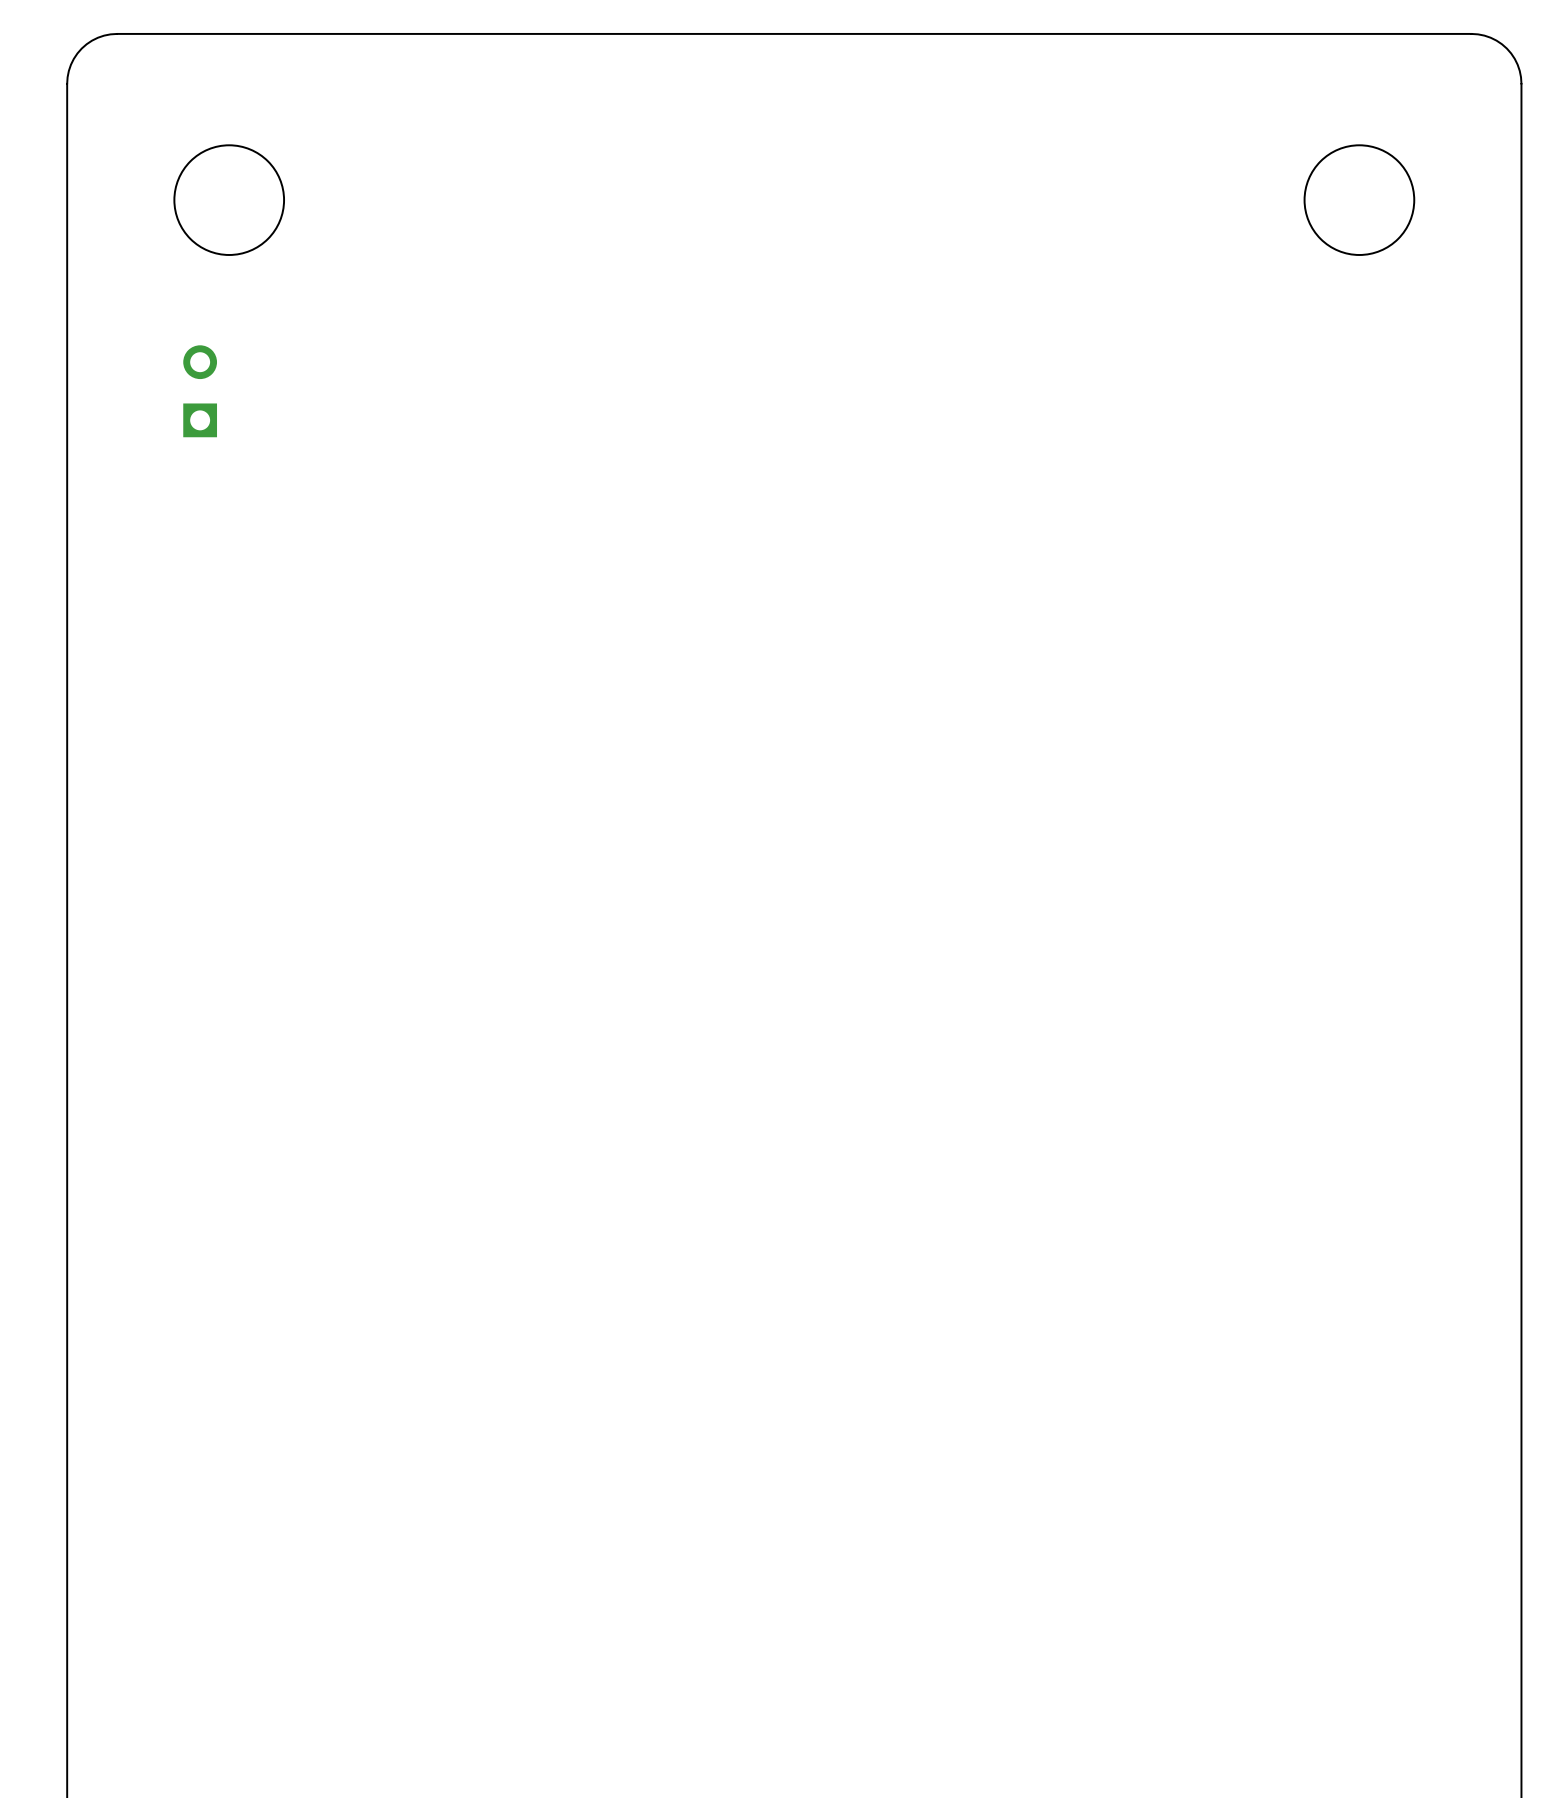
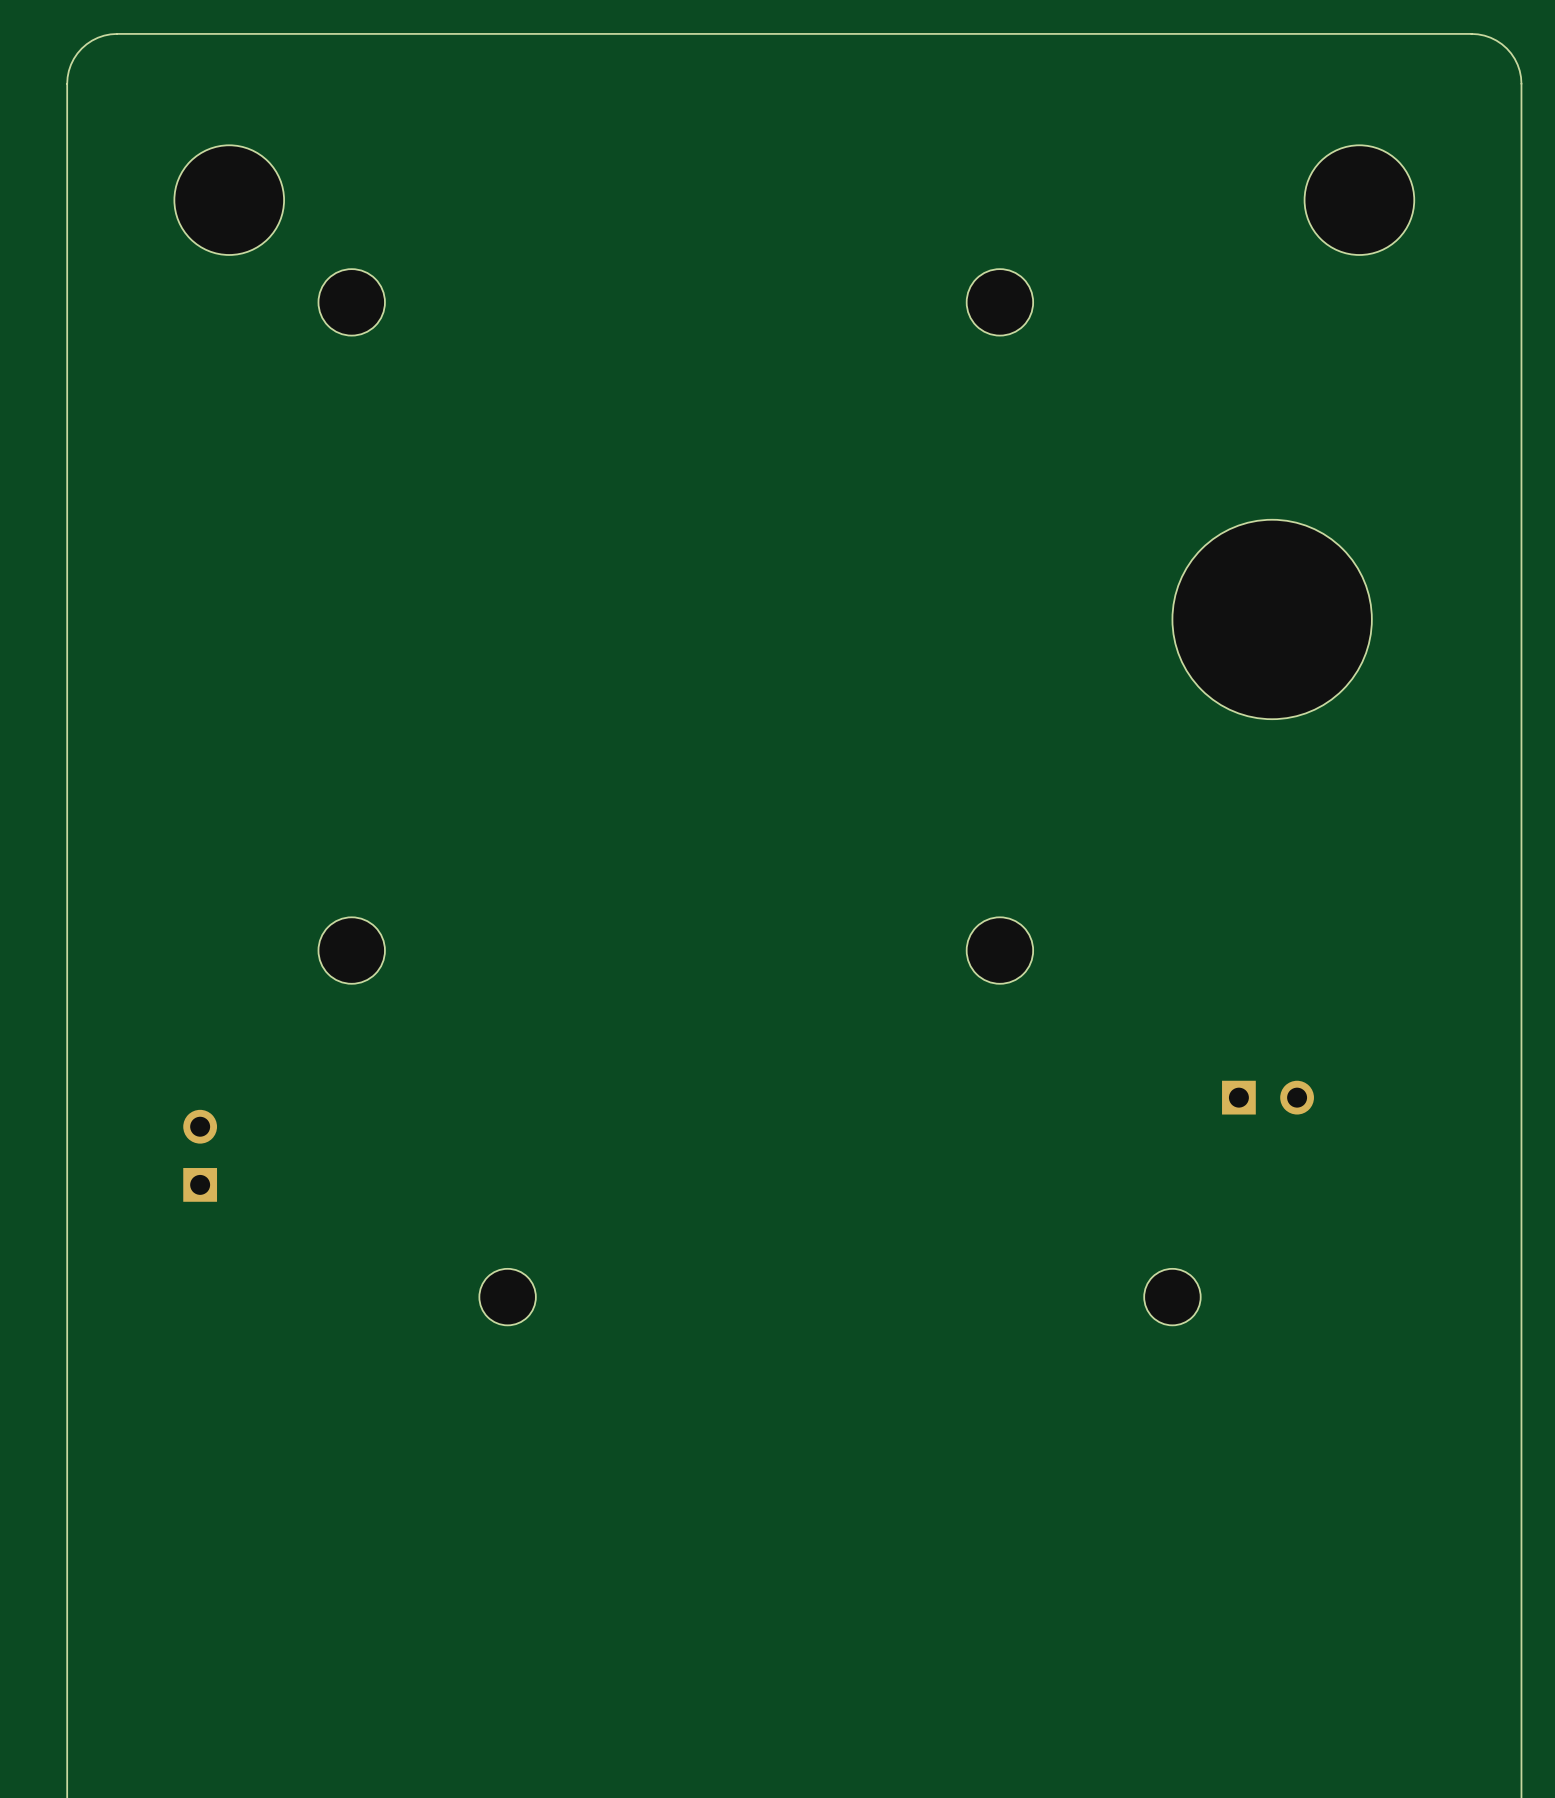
hole: none -> (351, 302)
hole: none -> (999, 302)
part: (200, 391) -> none
hole: none -> (1272, 619)
hole: none -> (351, 950)
hole: none -> (999, 950)
part: none -> (1268, 1097)
part: none -> (200, 1155)
hole: none -> (507, 1297)
hole: none -> (1172, 1297)

